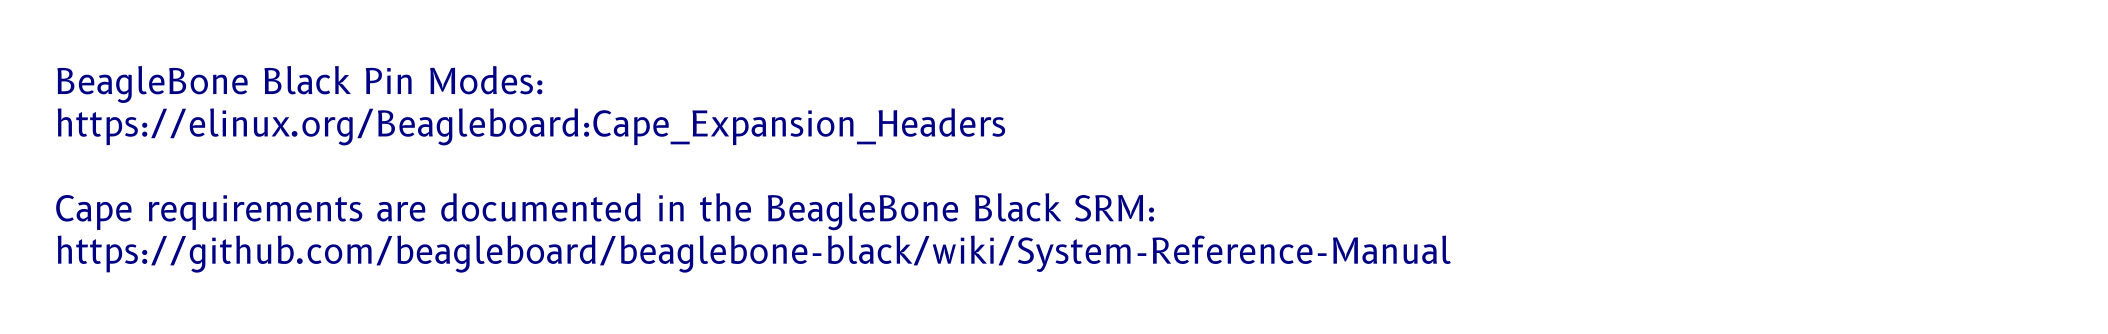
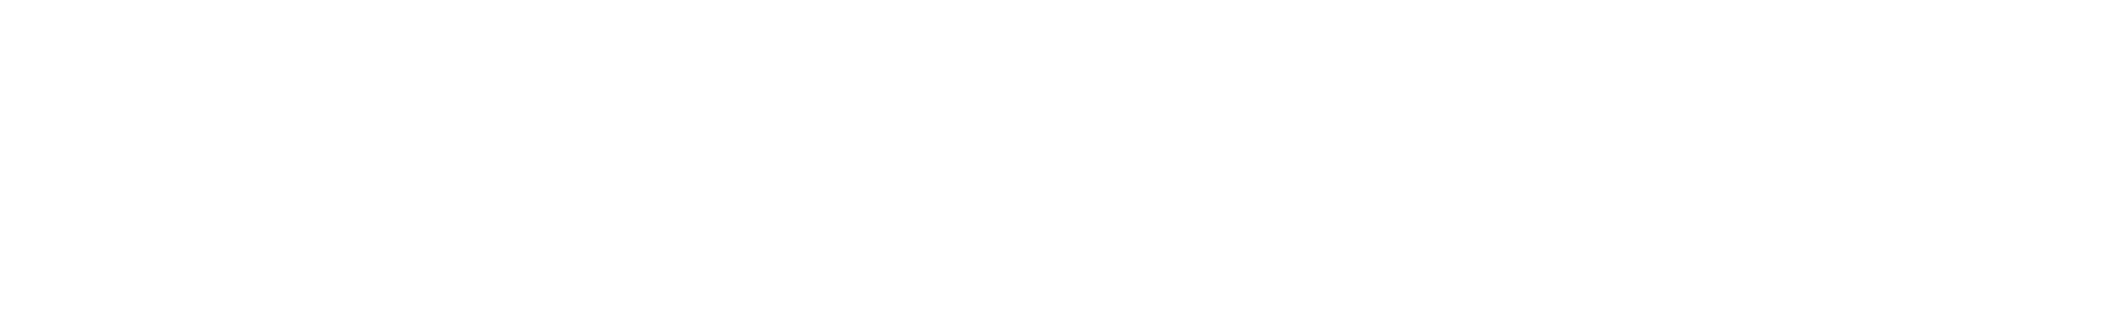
text: BeagleBone Black Pin Modes: (299, 84) -> none
text: https://elinux.org/Beagleboard:Cape_Expansion_Headers (531, 126) -> none
text: Cape requirements are documented in the BeagleBone Black SRM: (605, 211) -> none
text: https://github.com/beagleboard/beaglebone-black/wiki/System-Reference-Manual (754, 254) -> none

